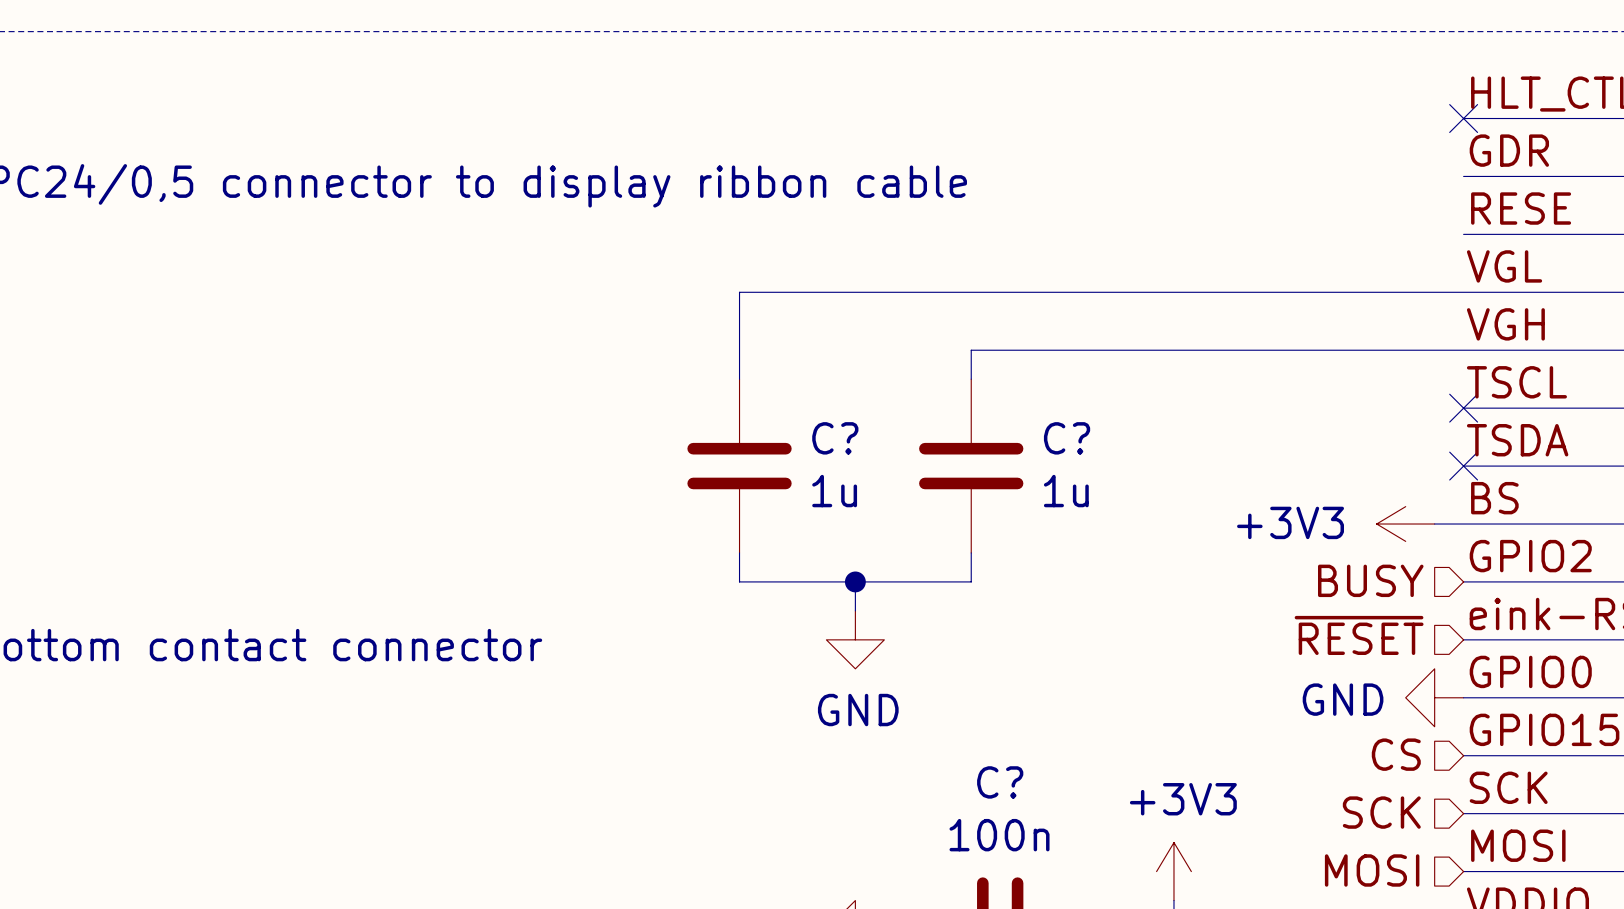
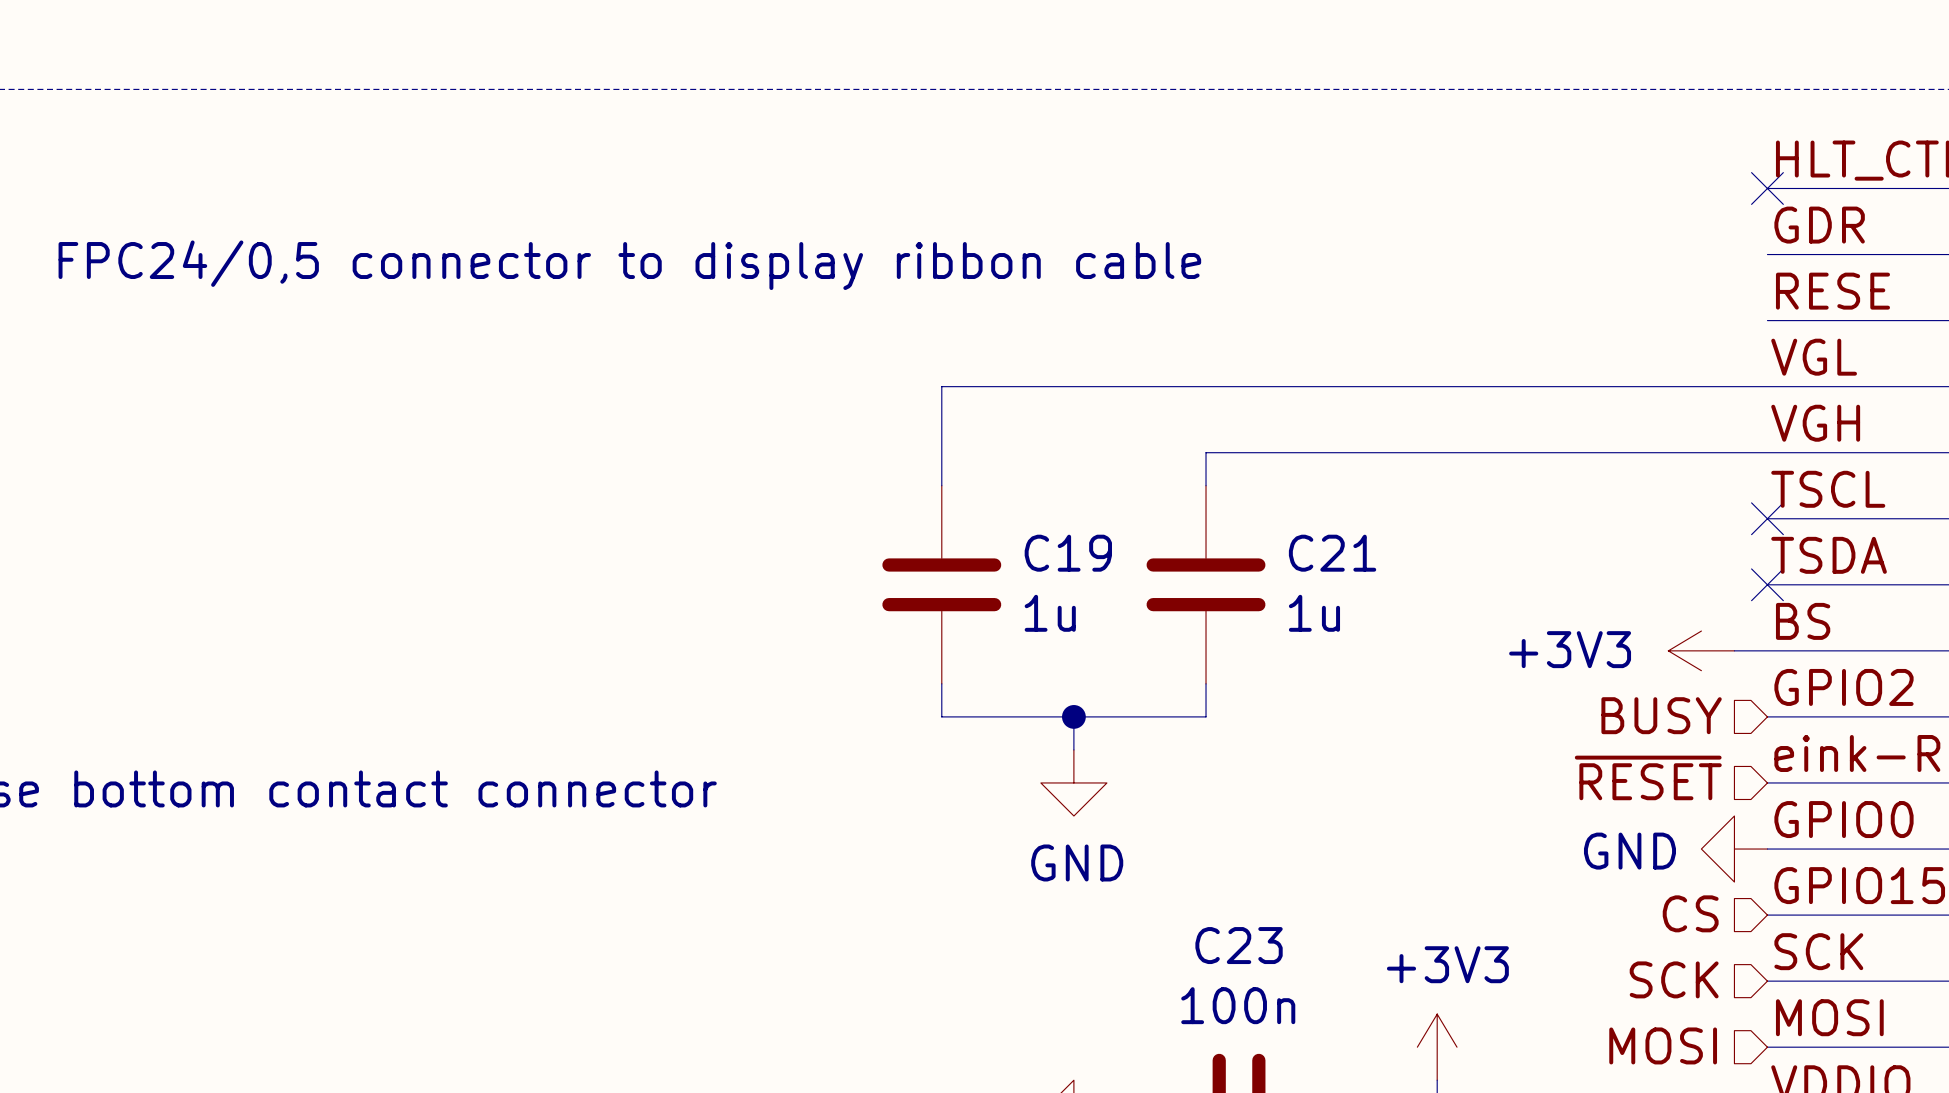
C? name: C? (835, 438) -> C19 (1068, 553)
C? name: C? (1067, 438) -> C21 (1332, 553)
C? name: C? (1000, 782) -> C23 (1239, 945)

